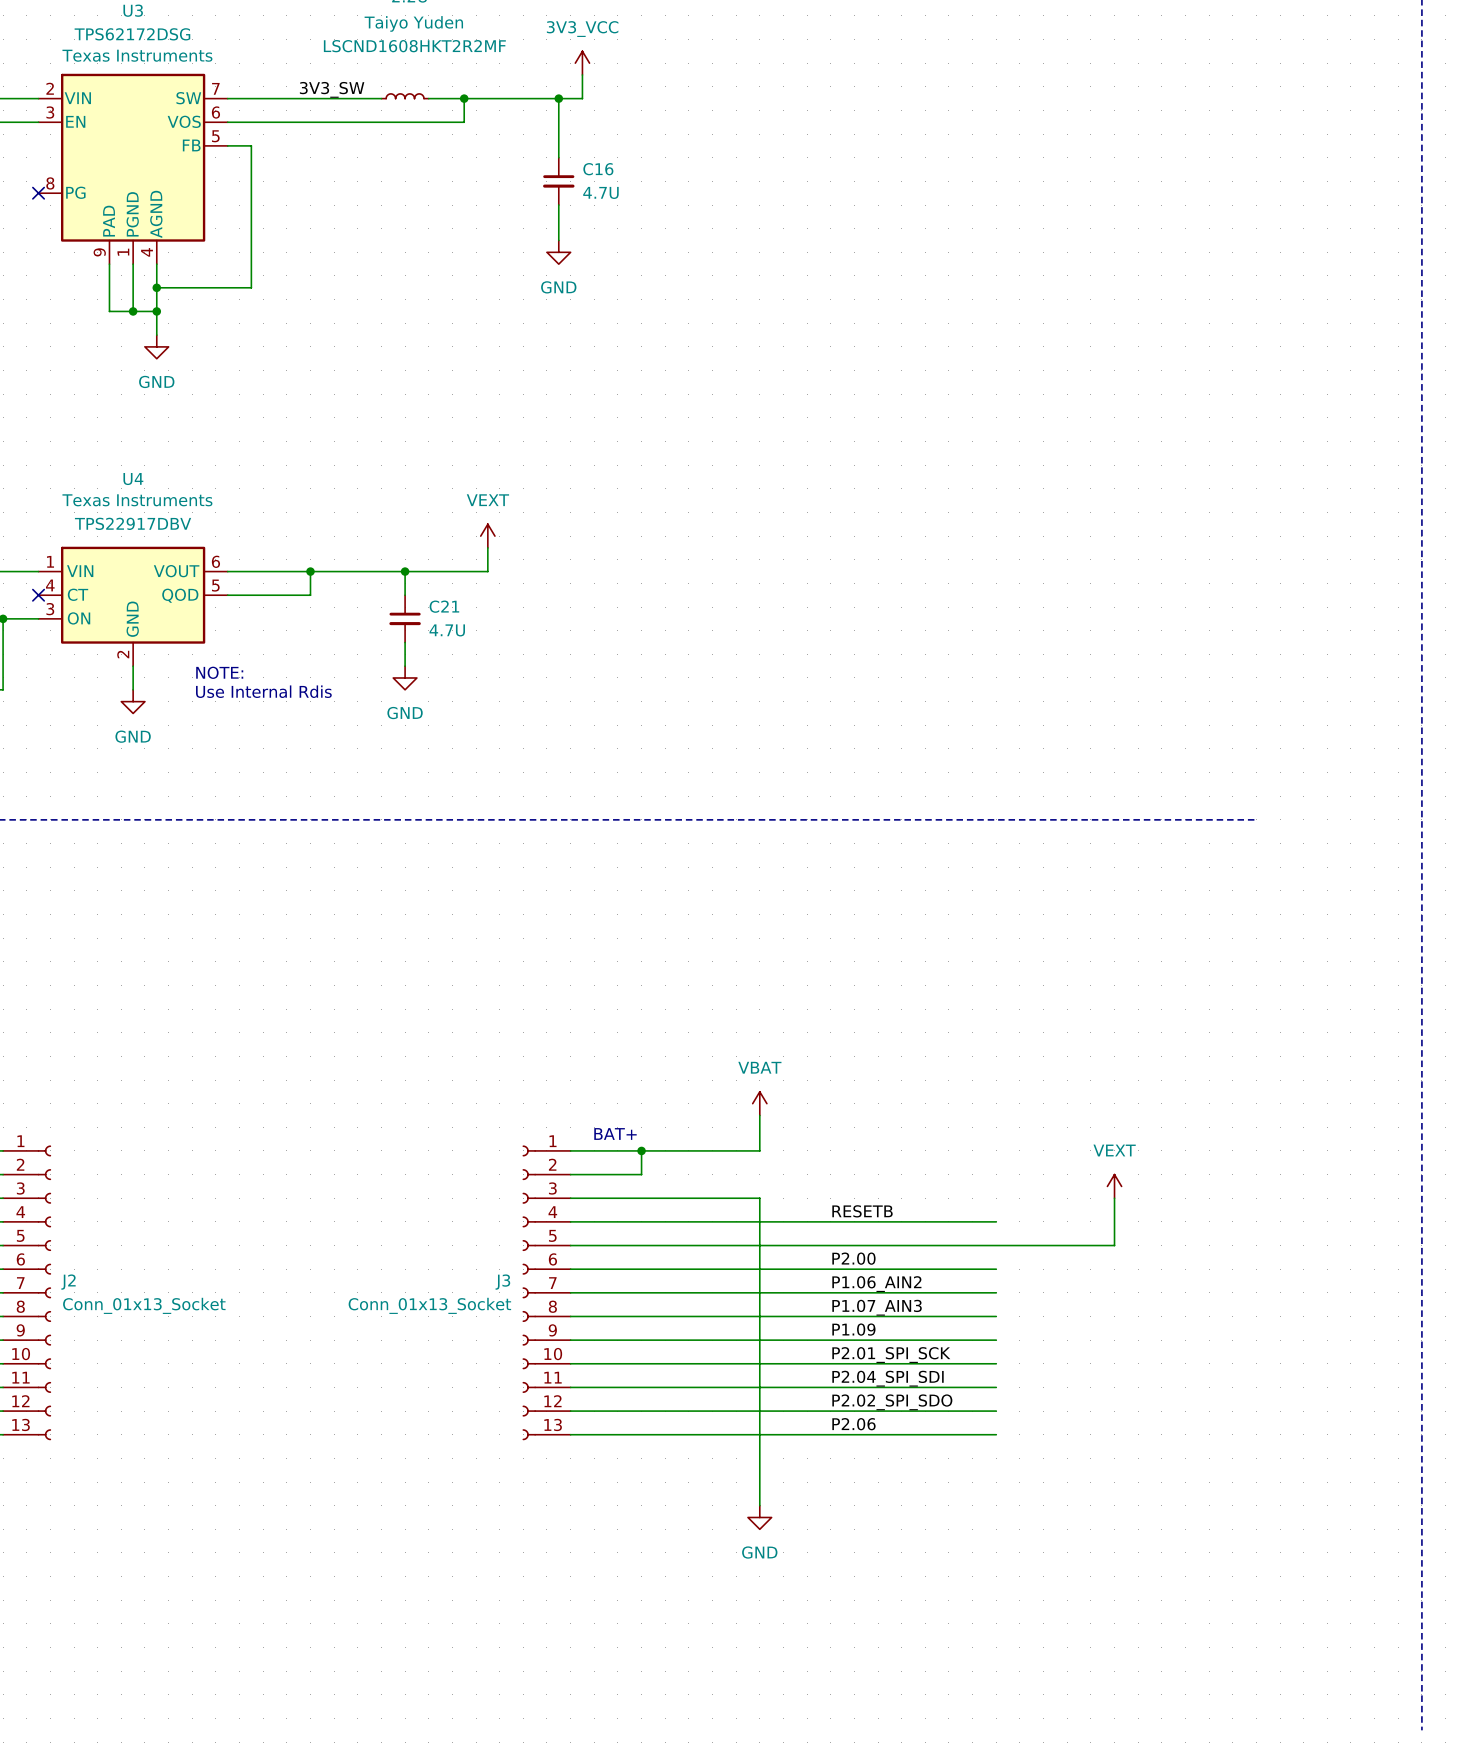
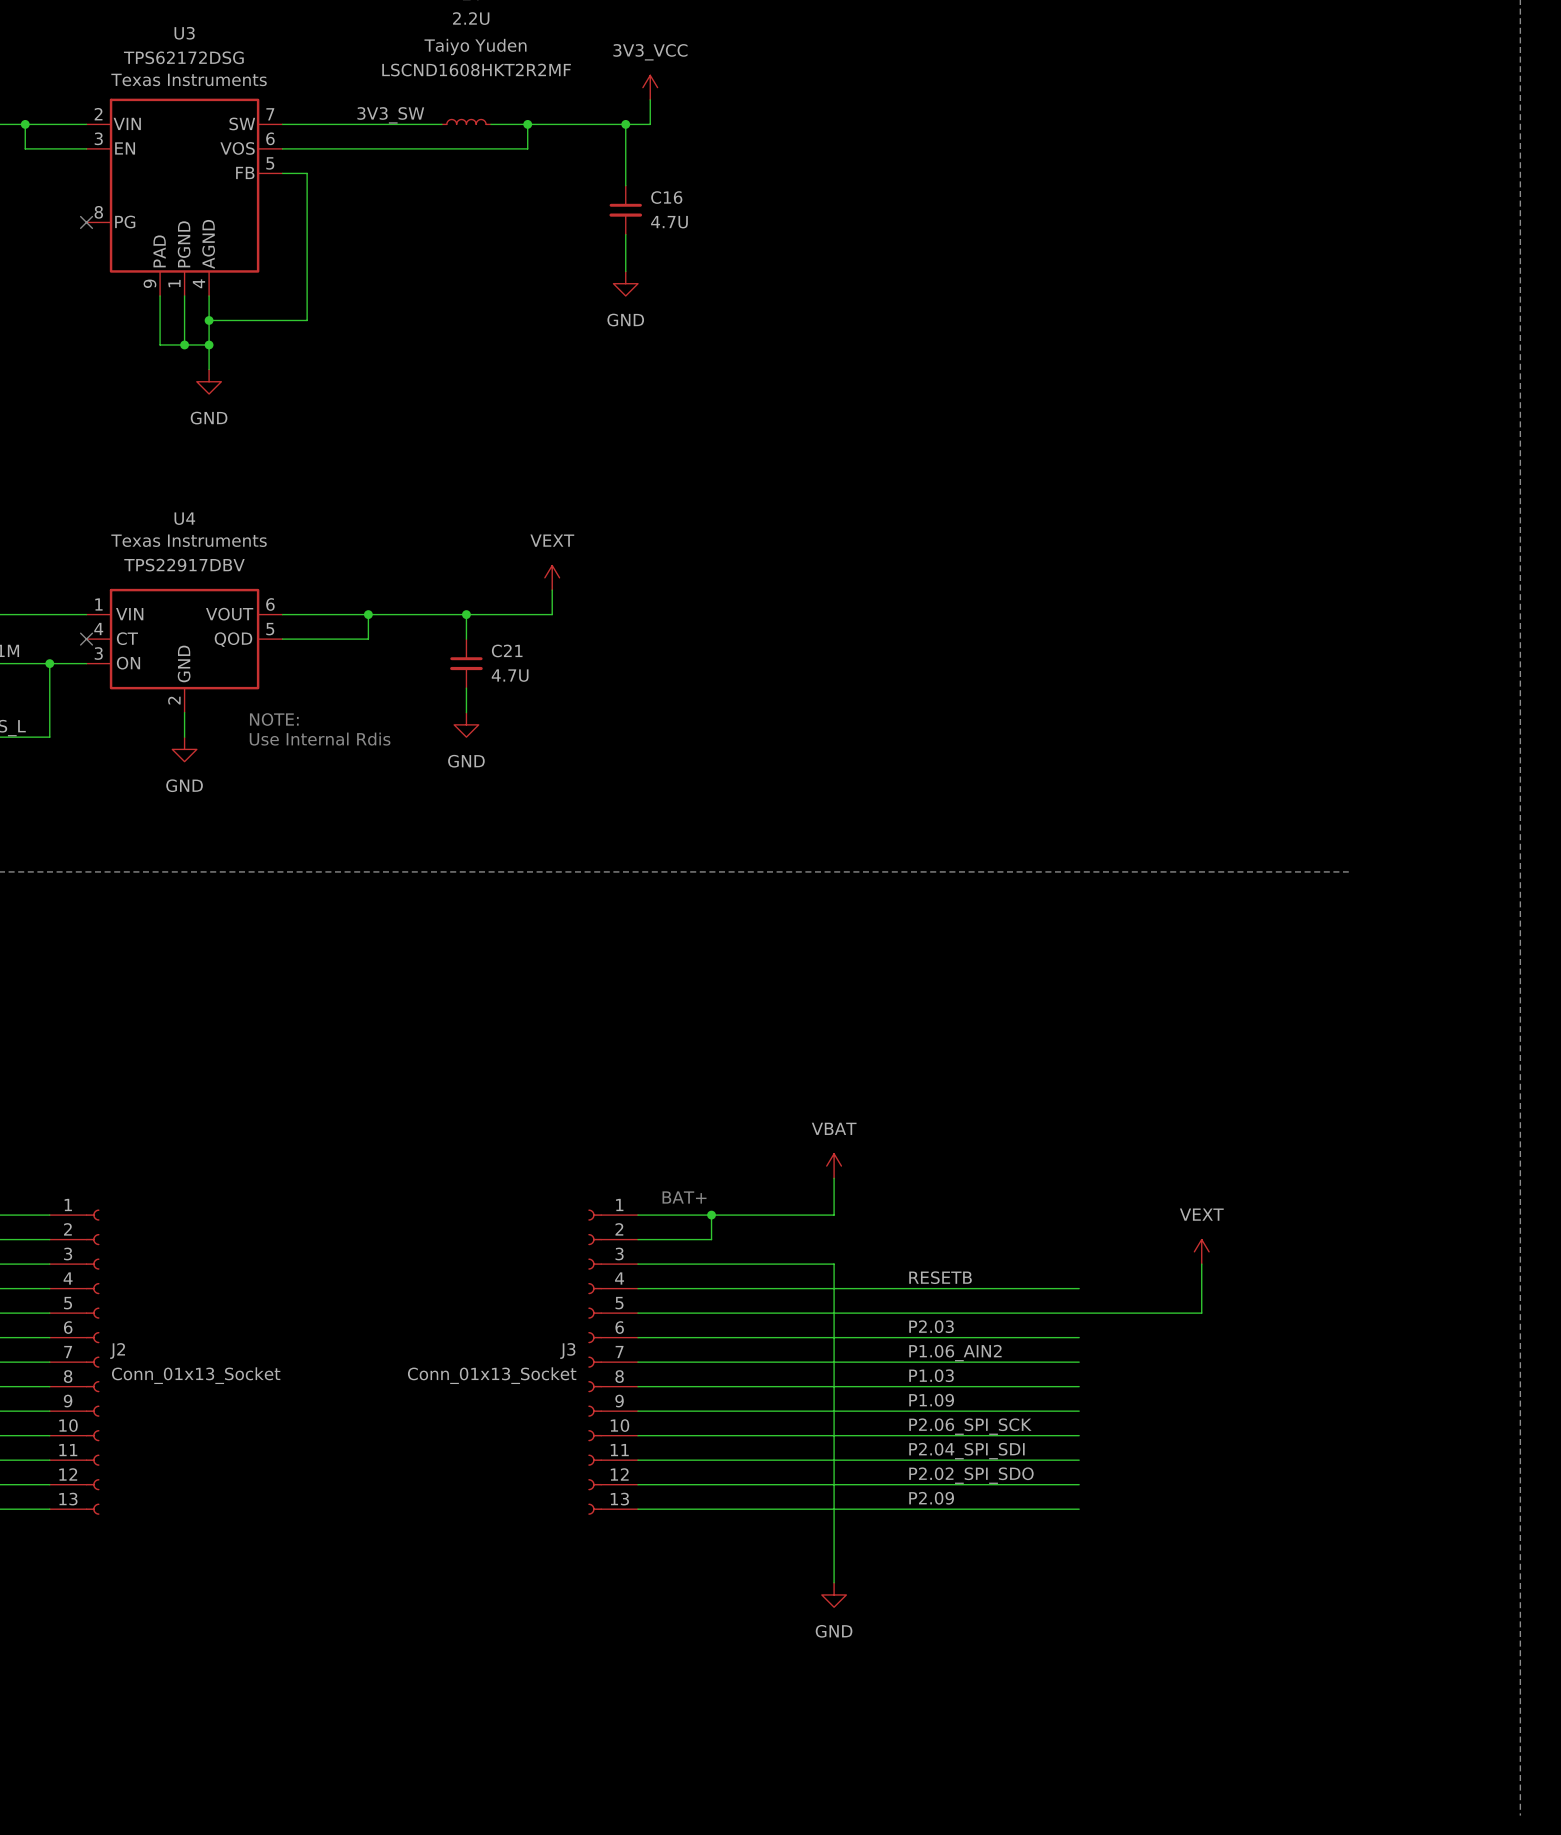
label: P2.00 (853, 1258) -> P2.03 (931, 1326)
label: P1.07_AIN3 (877, 1307) -> P1.03 (931, 1375)
label: P2.01_SPI_SCK (891, 1355) -> P2.06_SPI_SCK (970, 1426)
label: P2.06 (853, 1424) -> P2.09 (931, 1498)

